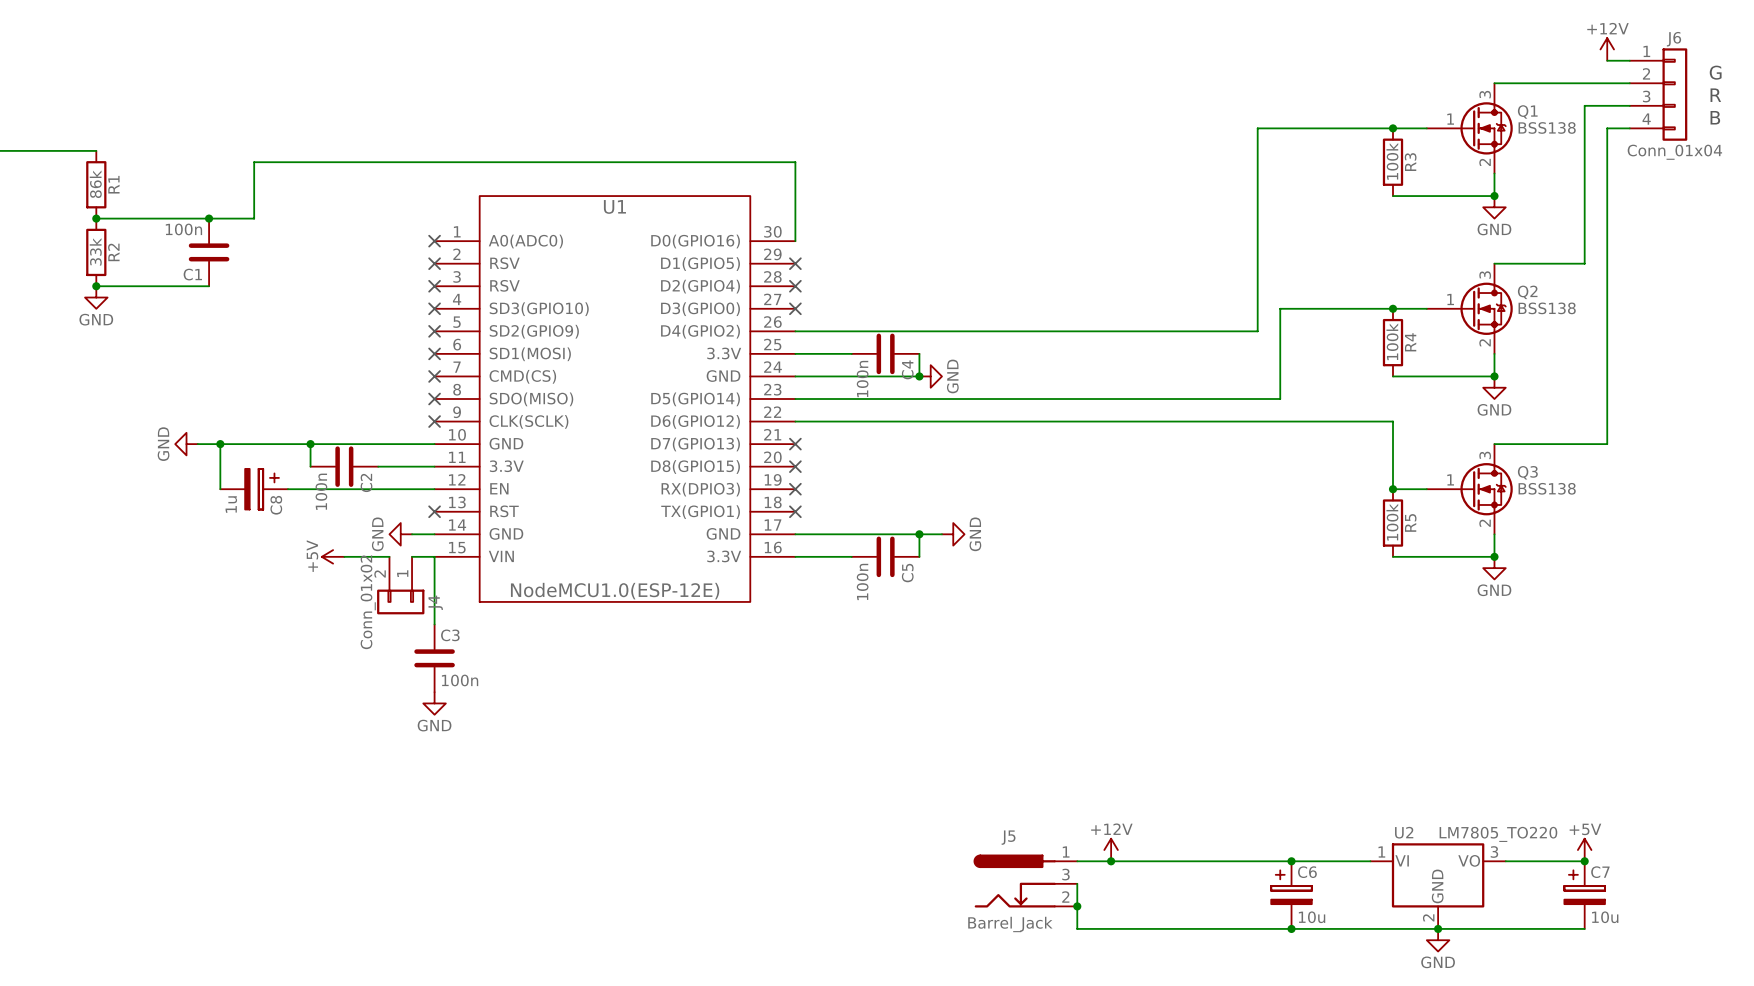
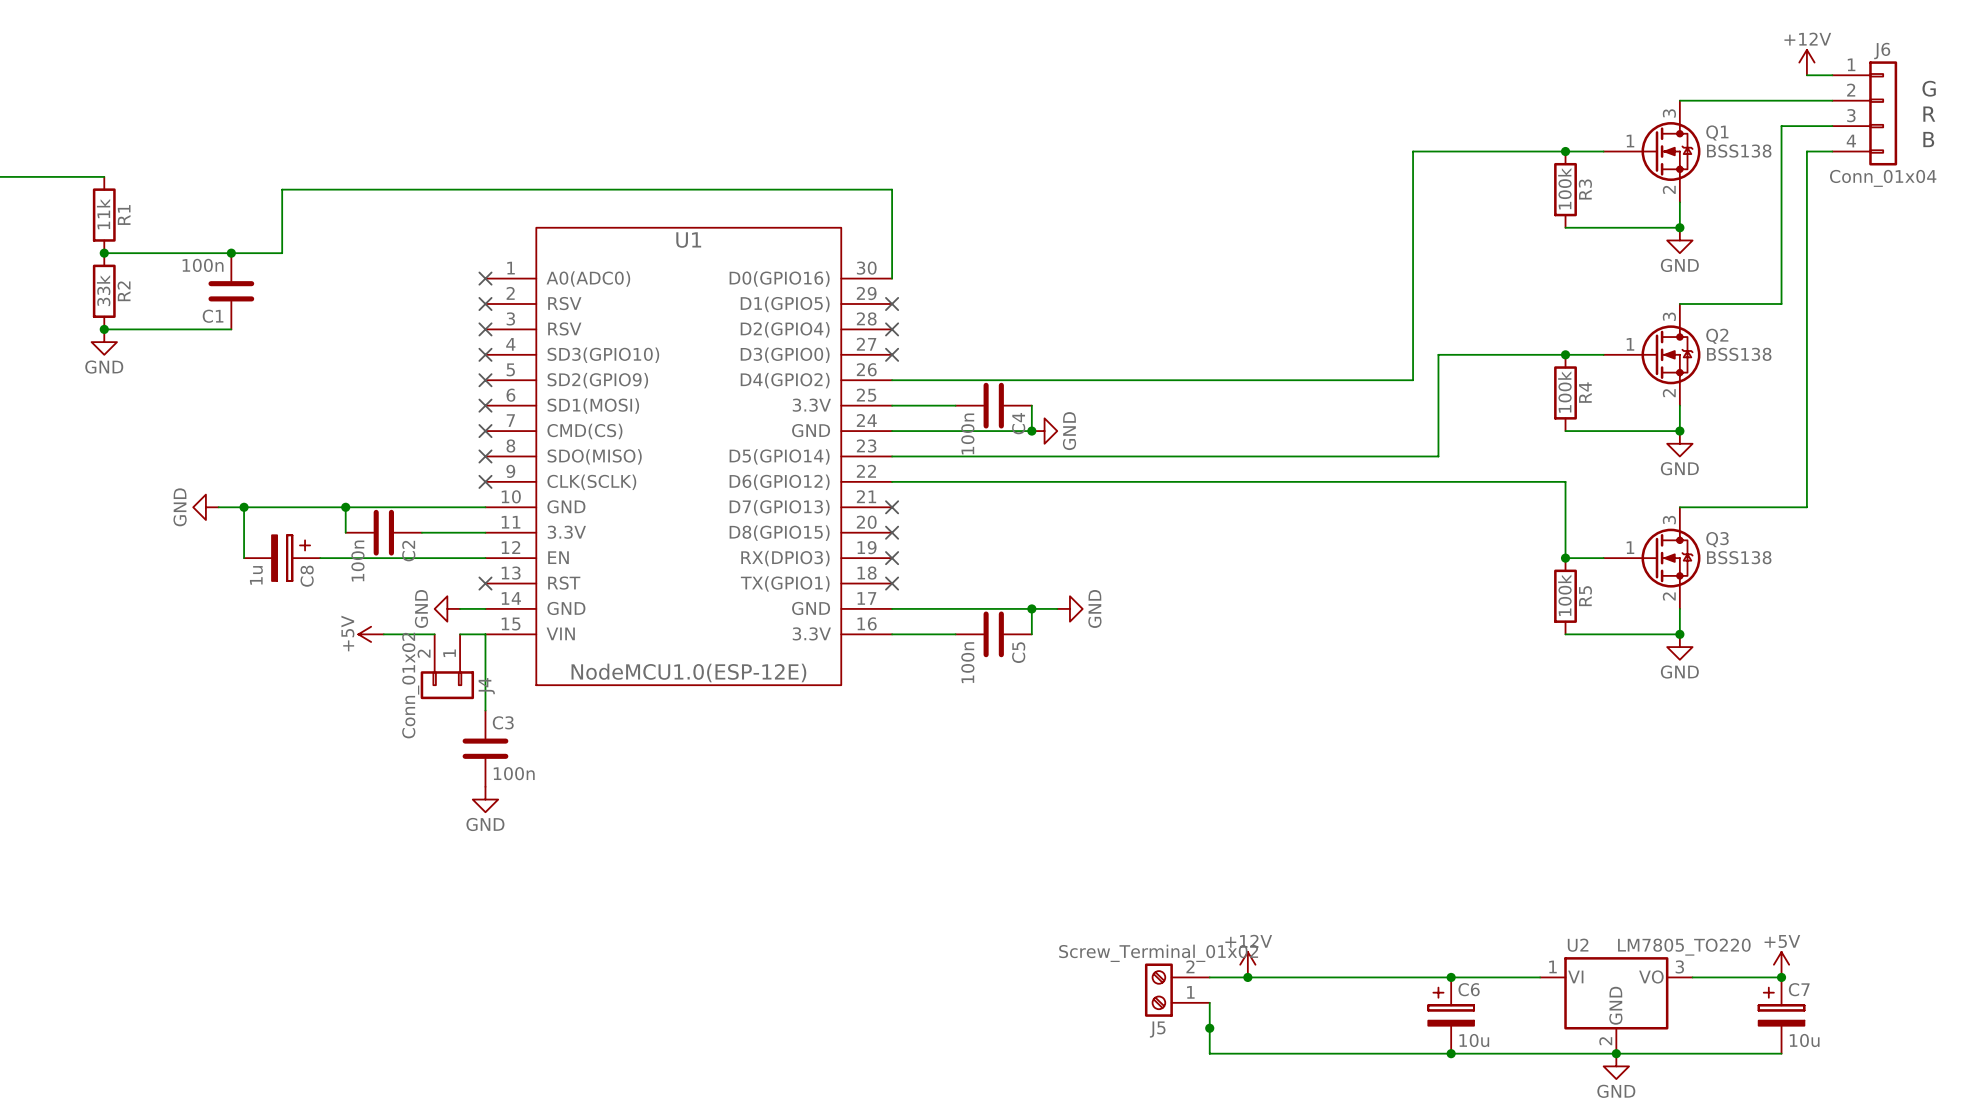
R1 value: 86k (95, 184) -> 11k (103, 214)
J5 name position: J5 (1008, 837) -> J5 (1157, 1029)
J5 symbol: [973, 854, 1078, 908] -> [1144, 963, 1210, 1017]
J5 value: Barrel_Jack (1010, 924) -> Screw_Terminal_01x02 (1158, 953)

